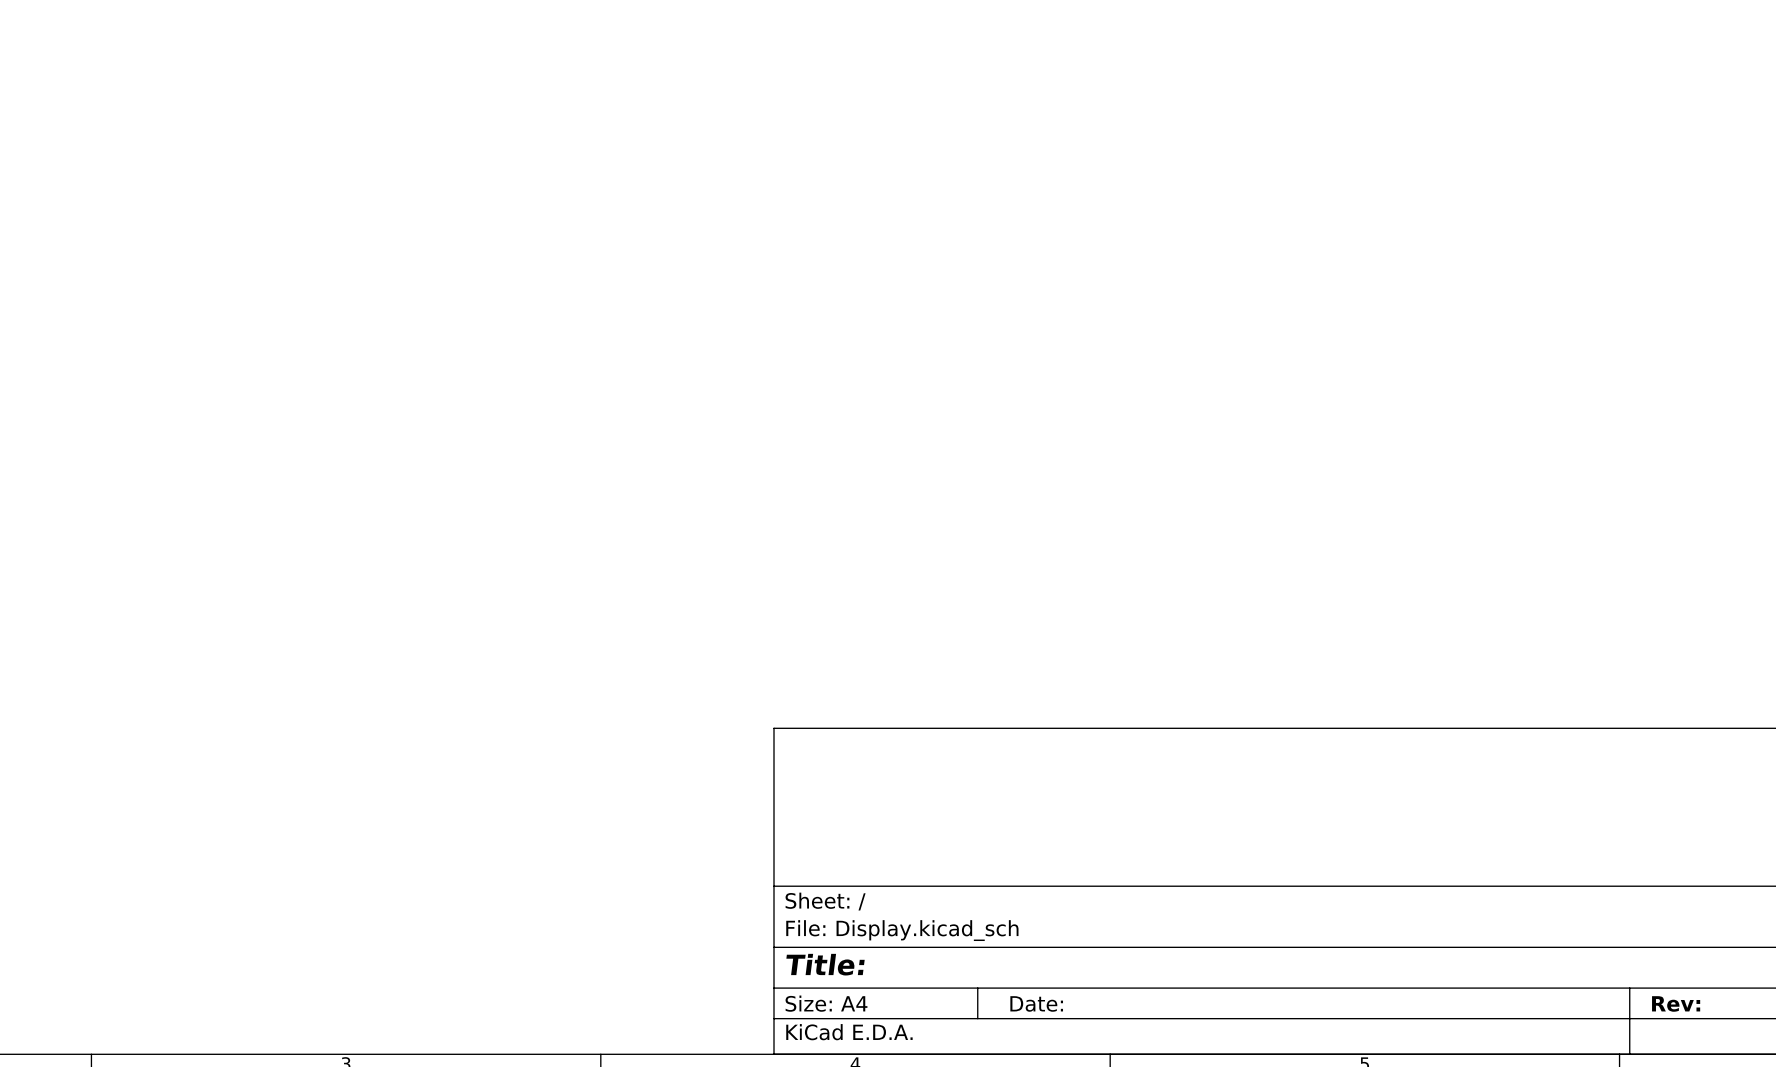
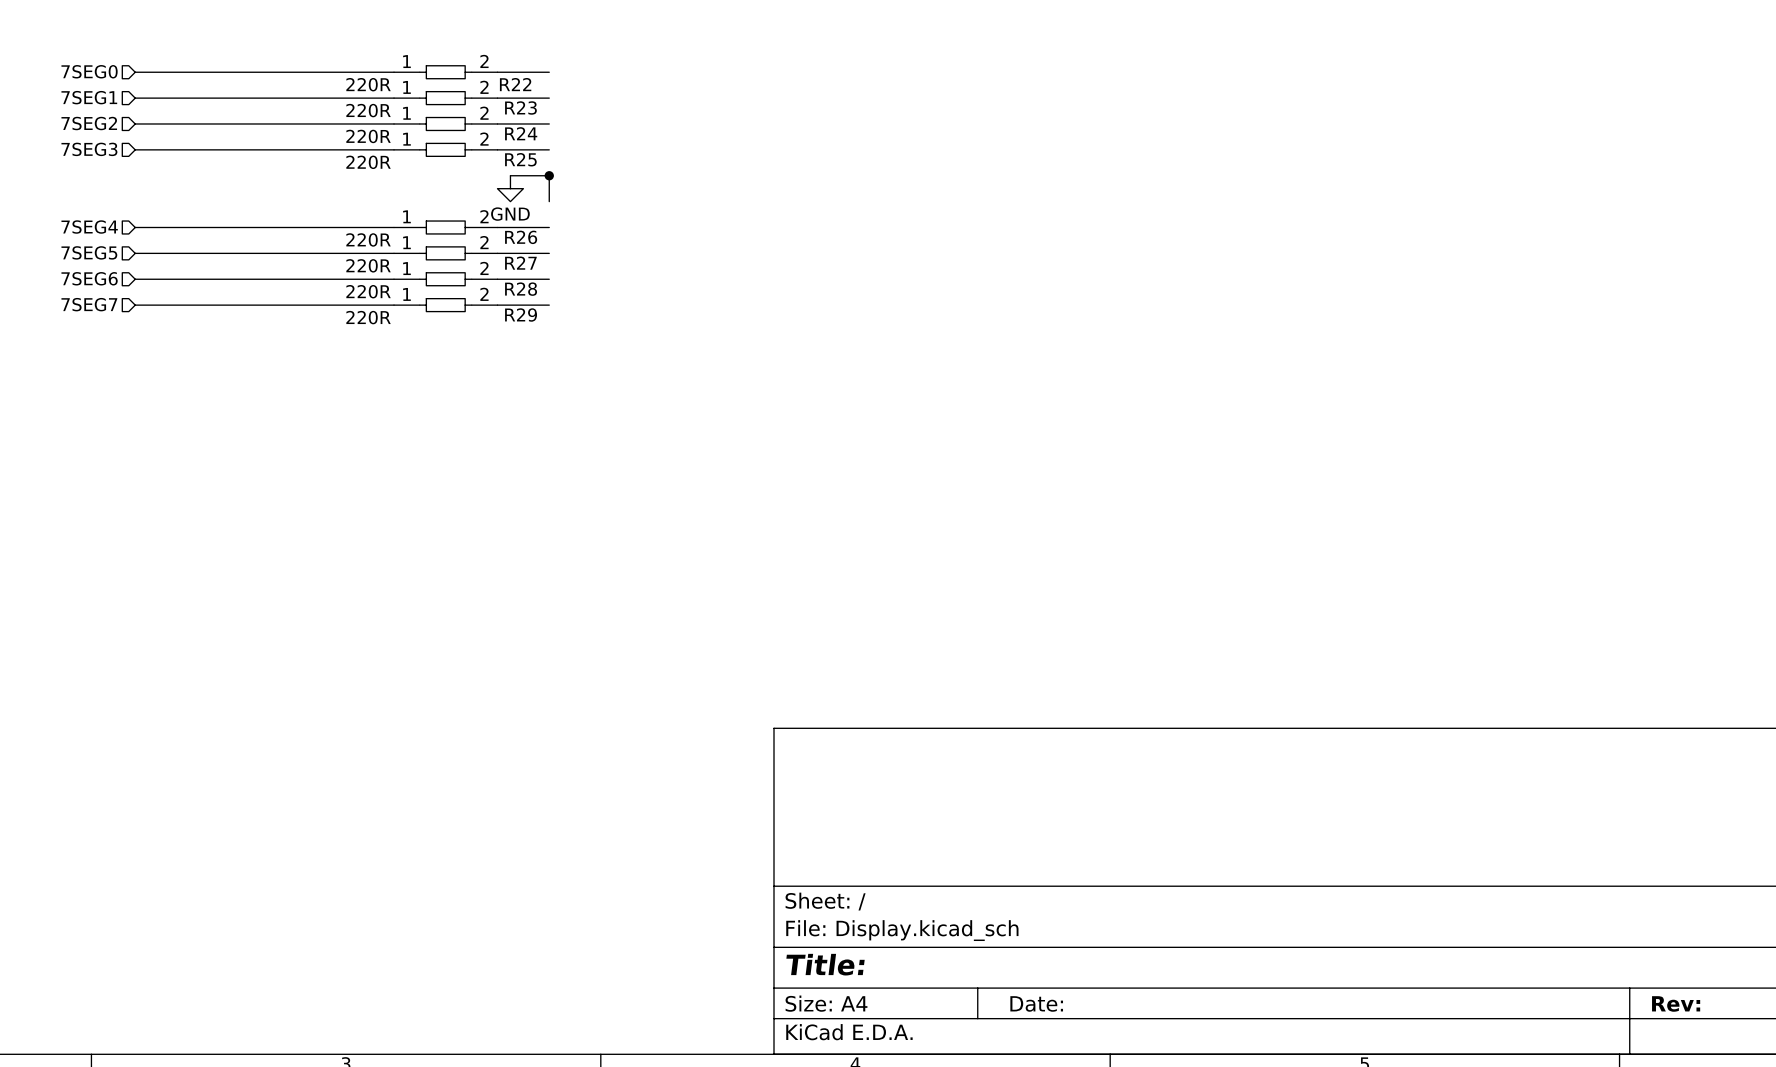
hierarchical label: none -> 7SEG0 (89, 71)
wire: none -> (135, 72) (394, 72)
R22: none -> (445, 72)
wire: none -> (497, 72) (549, 72)
hierarchical label: none -> 7SEG1 (89, 97)
wire: none -> (135, 98) (394, 98)
R23: none -> (445, 98)
wire: none -> (497, 98) (549, 98)
hierarchical label: none -> 7SEG2 (89, 123)
wire: none -> (135, 123) (394, 123)
R24: none -> (445, 123)
wire: none -> (497, 123) (549, 123)
hierarchical label: none -> 7SEG3 (89, 149)
wire: none -> (135, 149) (394, 149)
R25: none -> (445, 149)
wire: none -> (497, 149) (549, 149)
wire: none -> (510, 175) (549, 175) (549, 201)
junction: none -> (549, 175)
power symbol: none -> GND (510, 188)
hierarchical label: none -> 7SEG4 (89, 227)
wire: none -> (135, 227) (394, 227)
R26: none -> (445, 227)
wire: none -> (497, 227) (549, 227)
hierarchical label: none -> 7SEG5 (89, 252)
wire: none -> (135, 253) (394, 253)
R27: none -> (445, 253)
wire: none -> (497, 253) (549, 253)
hierarchical label: none -> 7SEG6 (89, 278)
wire: none -> (135, 279) (394, 279)
R28: none -> (445, 279)
wire: none -> (497, 279) (549, 279)
hierarchical label: none -> 7SEG7 (89, 304)
wire: none -> (135, 305) (394, 305)
R29: none -> (445, 305)
wire: none -> (497, 305) (549, 305)

